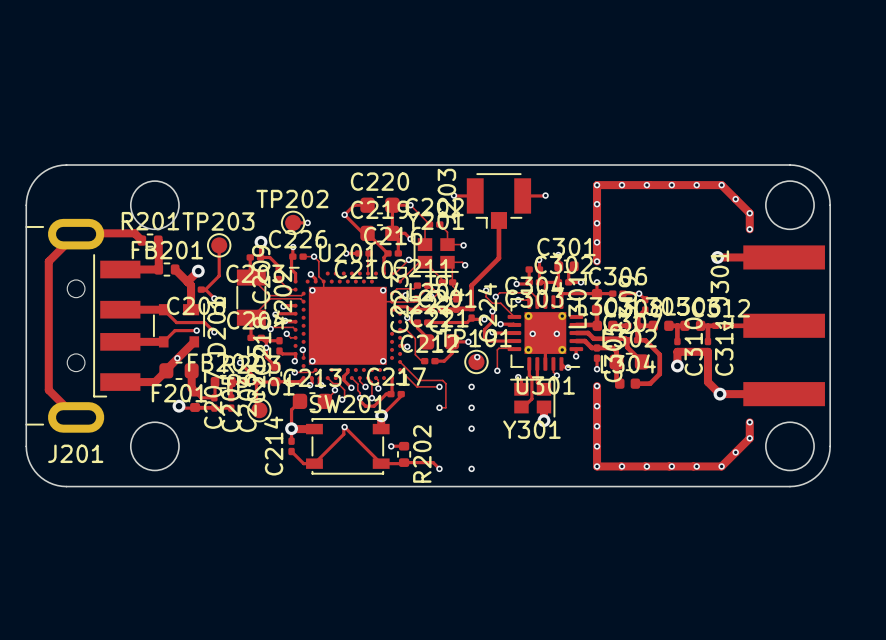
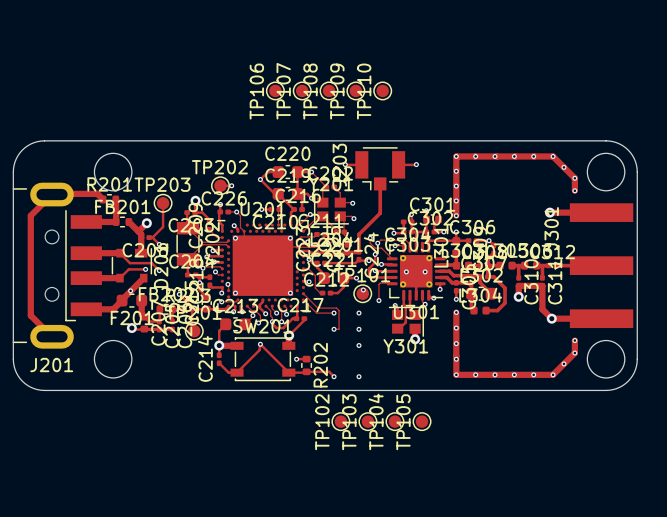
TP106: none -> (275, 90)
TP107: none -> (302, 90)
TP108: none -> (329, 90)
TP109: none -> (355, 90)
TP110: none -> (382, 90)
TP102: none -> (340, 421)
TP103: none -> (367, 421)
TP104: none -> (394, 421)
TP105: none -> (422, 421)

